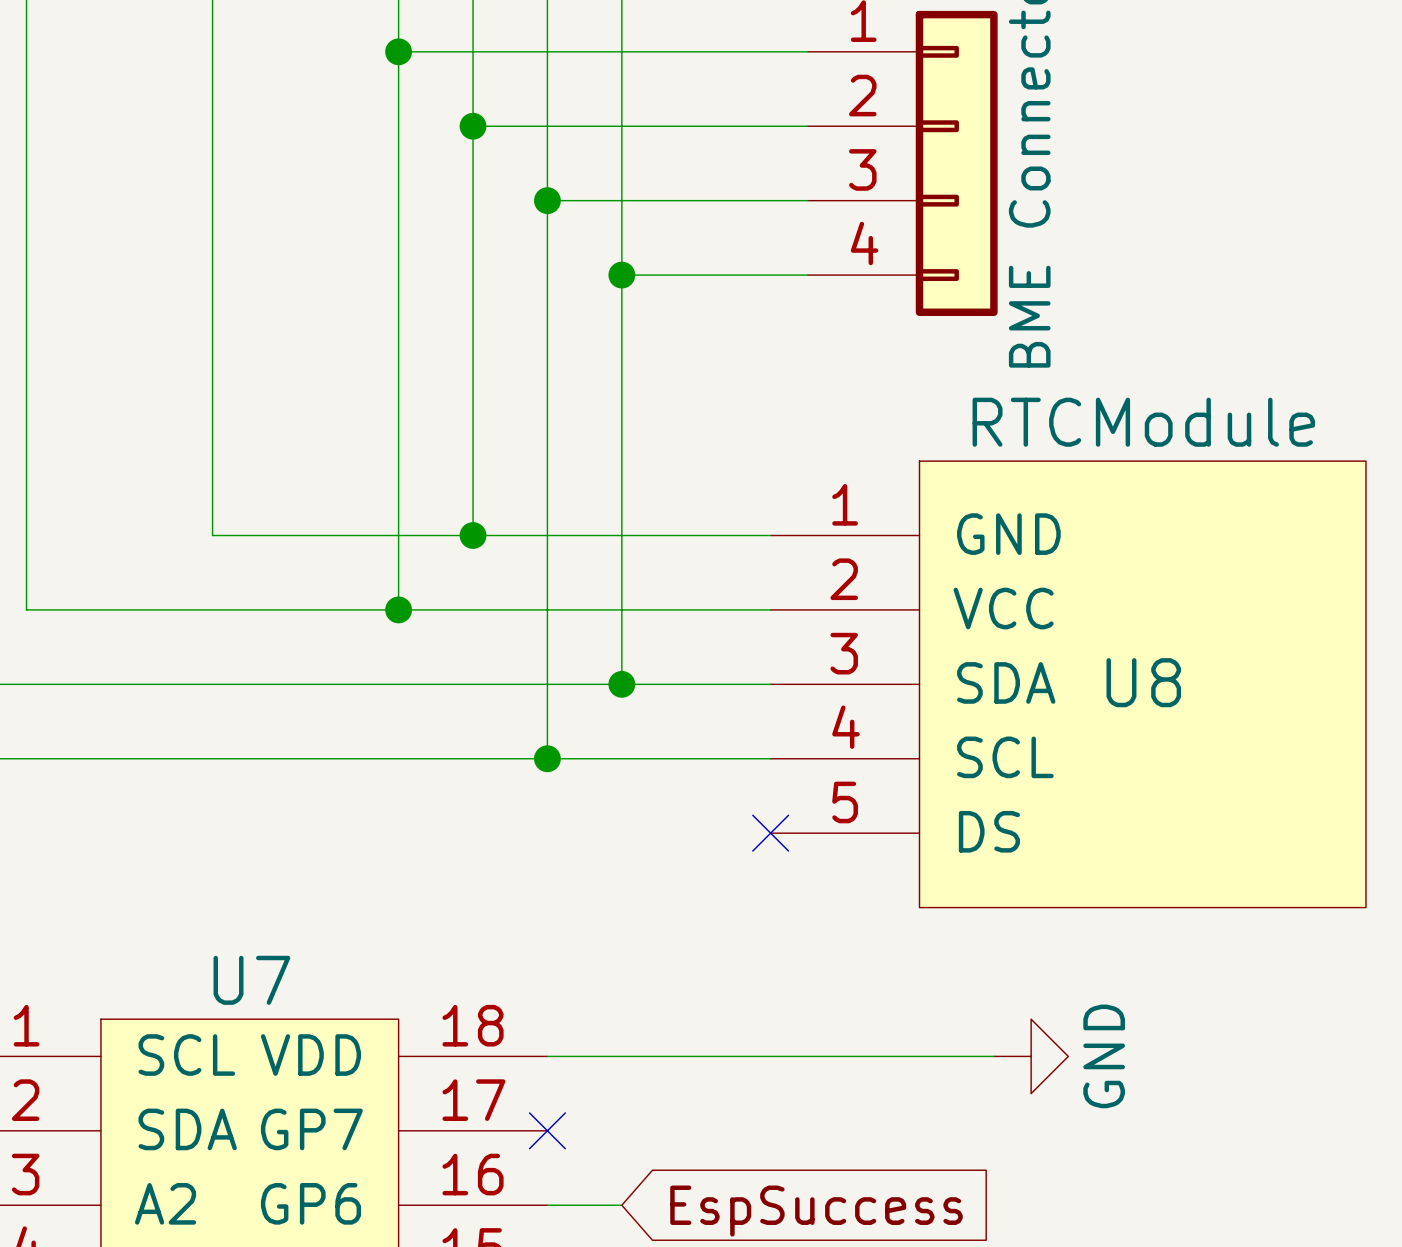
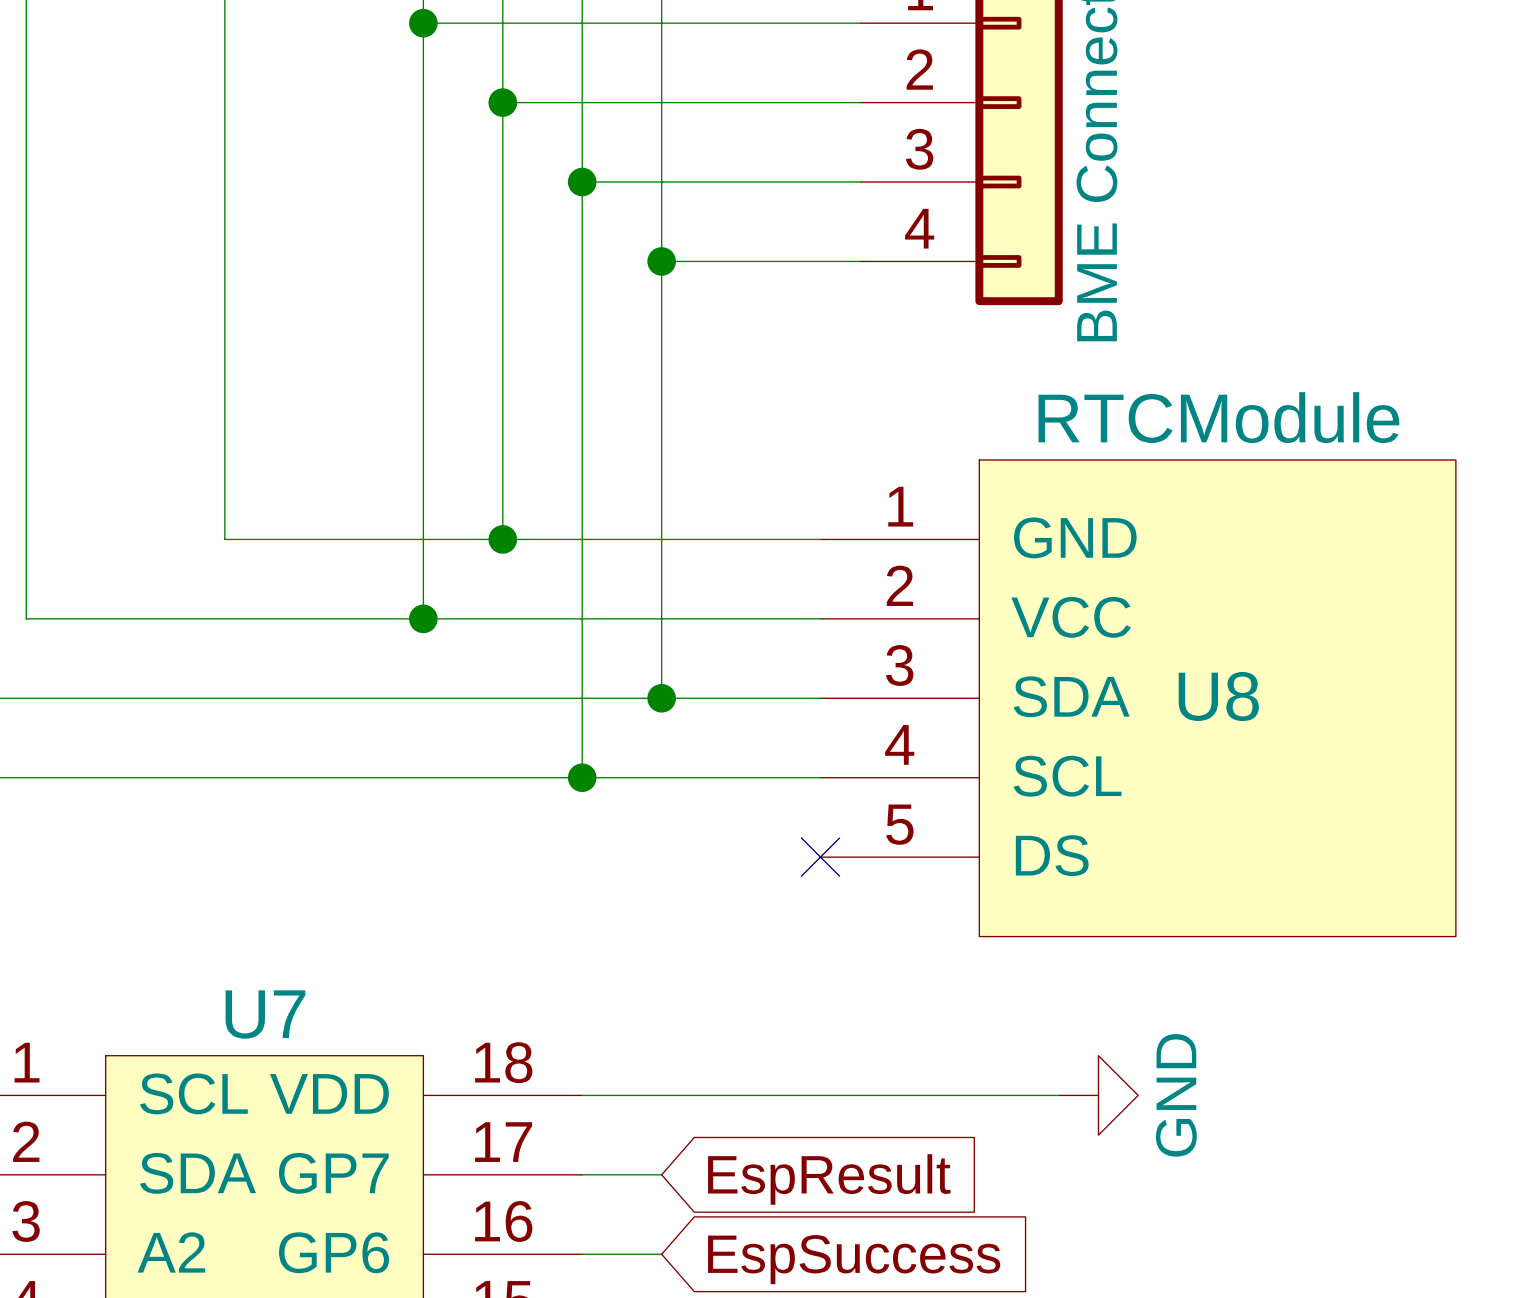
wire: none -> (582, 1174) (661, 1174)
no-connect mark: (547, 1130) -> none
global label: none -> EspResult (829, 1179)

